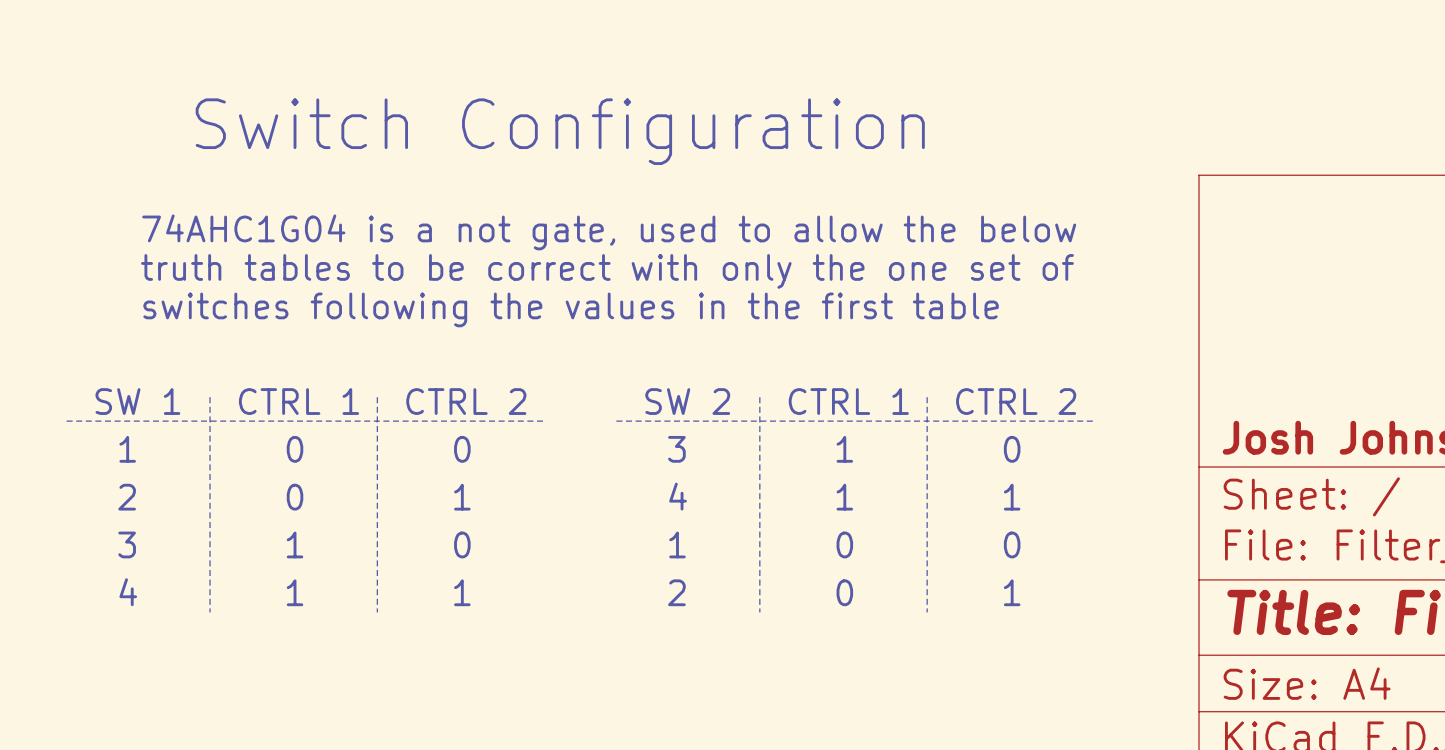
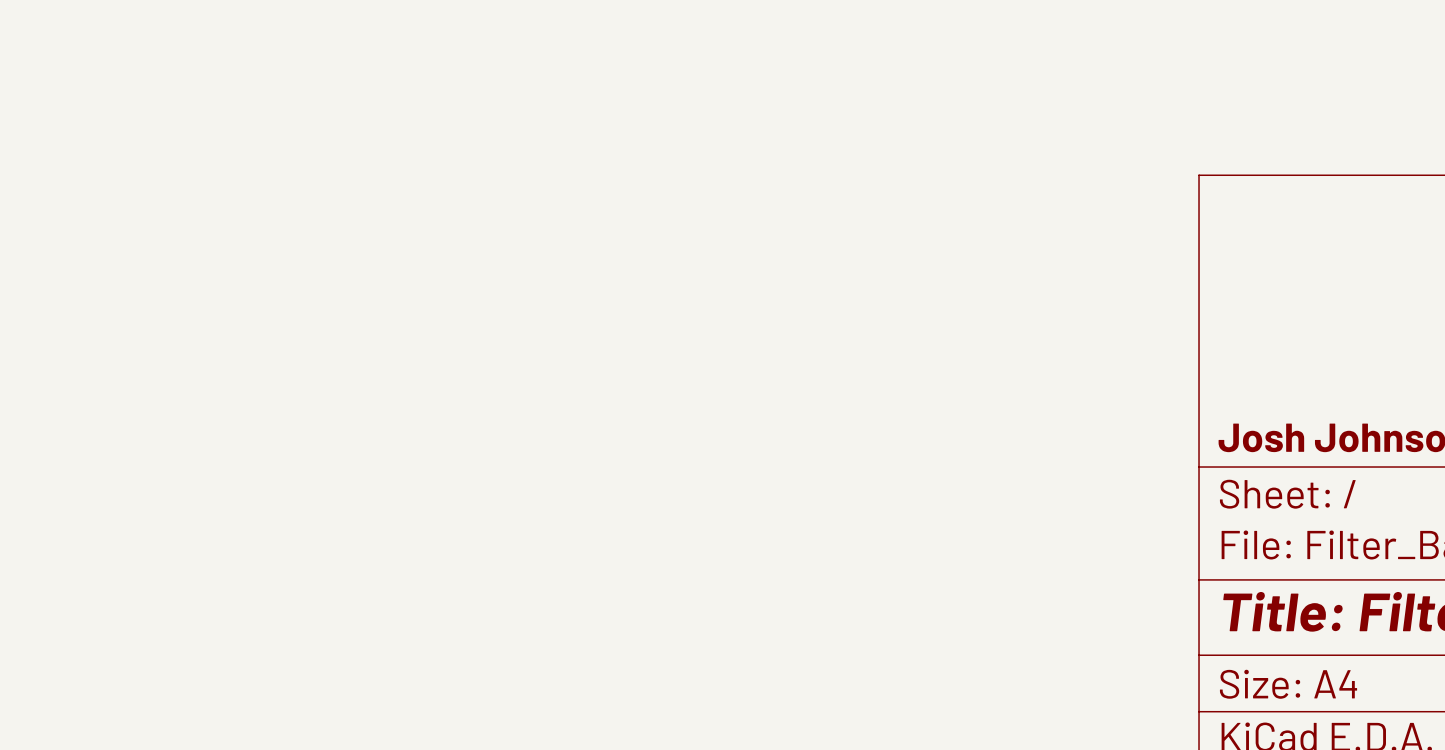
text: Switch Configuration (560, 131) -> none
text: 74AHC1G04 is a not gate, used to allow the below (609, 232) -> none
text: truth tables to be correct with only the one set of (607, 271) -> none
text: switches following the values in the first table (571, 309) -> none
line: (210, 397) (210, 612) -> none
line: (377, 397) (377, 612) -> none
line: (759, 397) (759, 612) -> none
line: (927, 397) (927, 612) -> none
text: SW 1 (137, 401) -> none
text: CTRL 1 (298, 401) -> none
text: CTRL 2 (466, 401) -> none
text: SW 2 (687, 401) -> none
text: CTRL 1 (848, 401) -> none
text: CTRL 2 (1016, 401) -> none
line: (66, 421) (544, 421) -> none
line: (616, 421) (1094, 421) -> none
text: 1 (127, 449) -> none
text: 0 (295, 449) -> none
text: 0 (462, 449) -> none
text: 3 (676, 449) -> none
text: 1 (844, 449) -> none
text: 0 (1012, 449) -> none
text: 4 (678, 496) -> none
text: 2 (127, 497) -> none
text: 0 (295, 497) -> none
text: 1 (462, 497) -> none
text: 1 (844, 497) -> none
text: 1 (1012, 497) -> none
text: 3 (127, 544) -> none
text: 1 (295, 544) -> none
text: 0 (462, 544) -> none
text: 1 (677, 544) -> none
text: 0 (844, 544) -> none
text: 0 (1012, 544) -> none
text: 4 (128, 592) -> none
text: 1 (295, 592) -> none
text: 1 (462, 592) -> none
text: 2 (676, 592) -> none
text: 0 (844, 592) -> none
text: 1 (1012, 592) -> none

